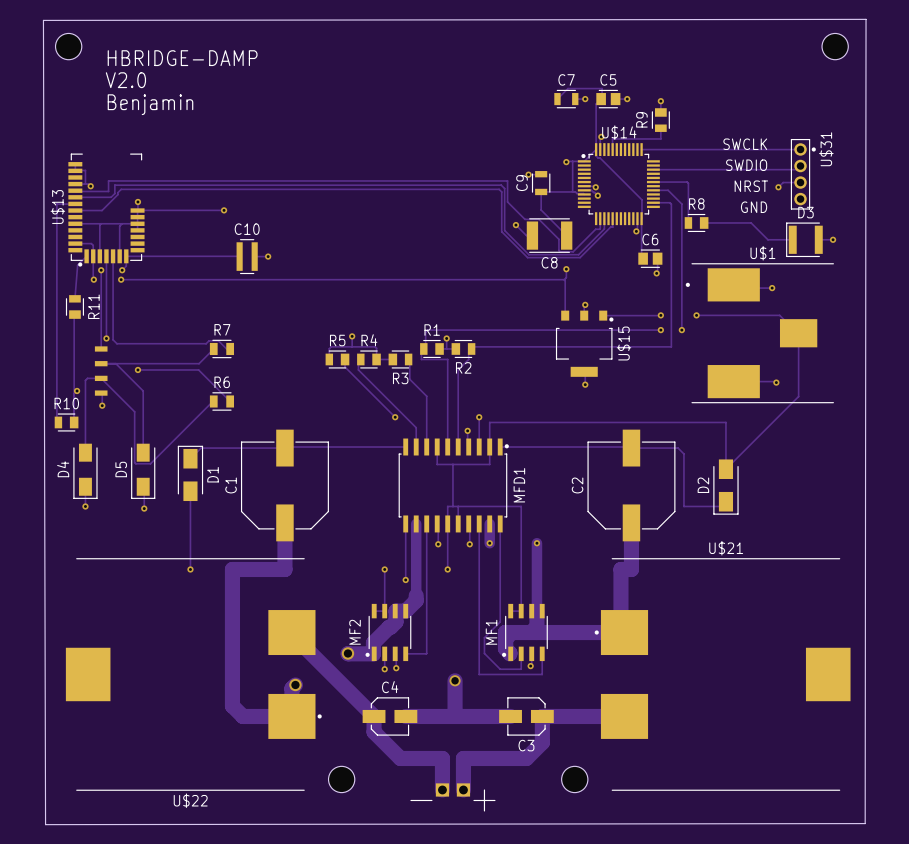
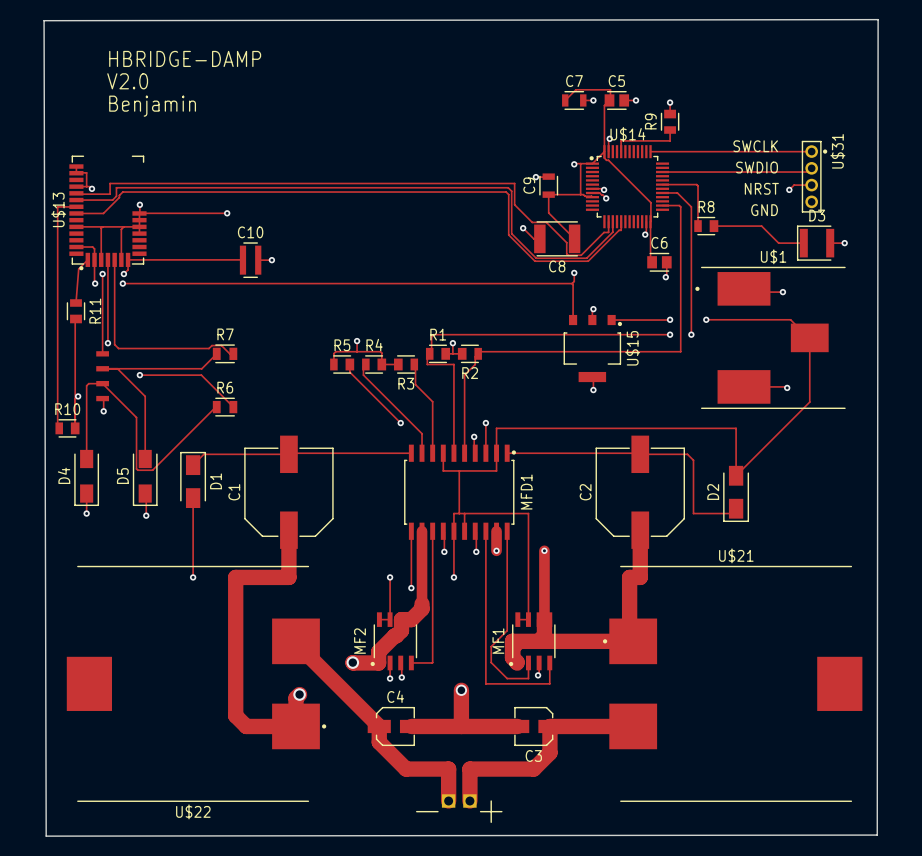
hole: (68, 46) -> none
hole: (835, 46) -> none
hole: (341, 779) -> none
hole: (574, 779) -> none

